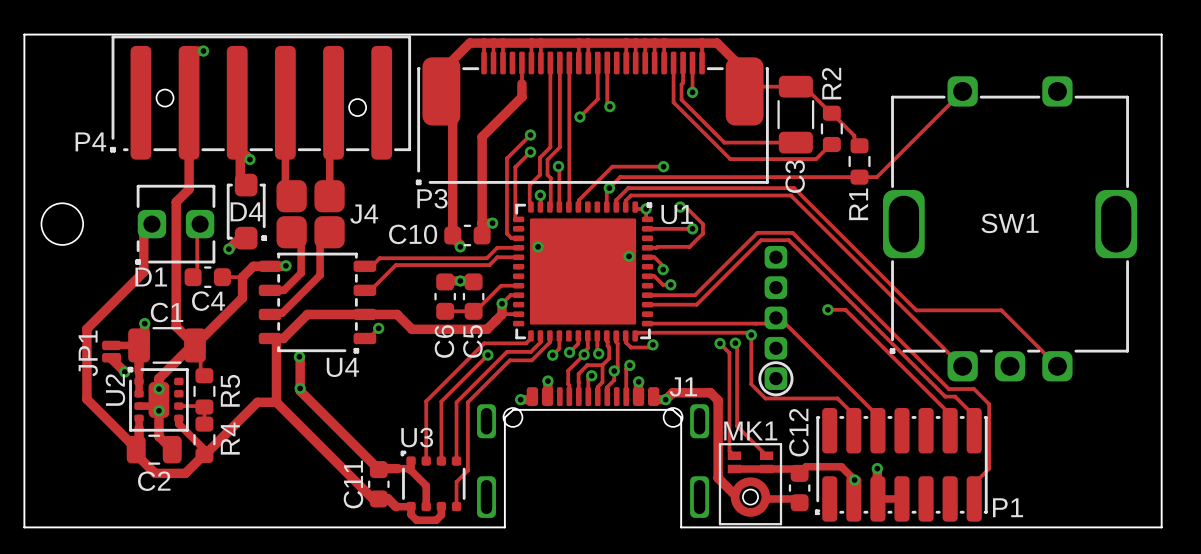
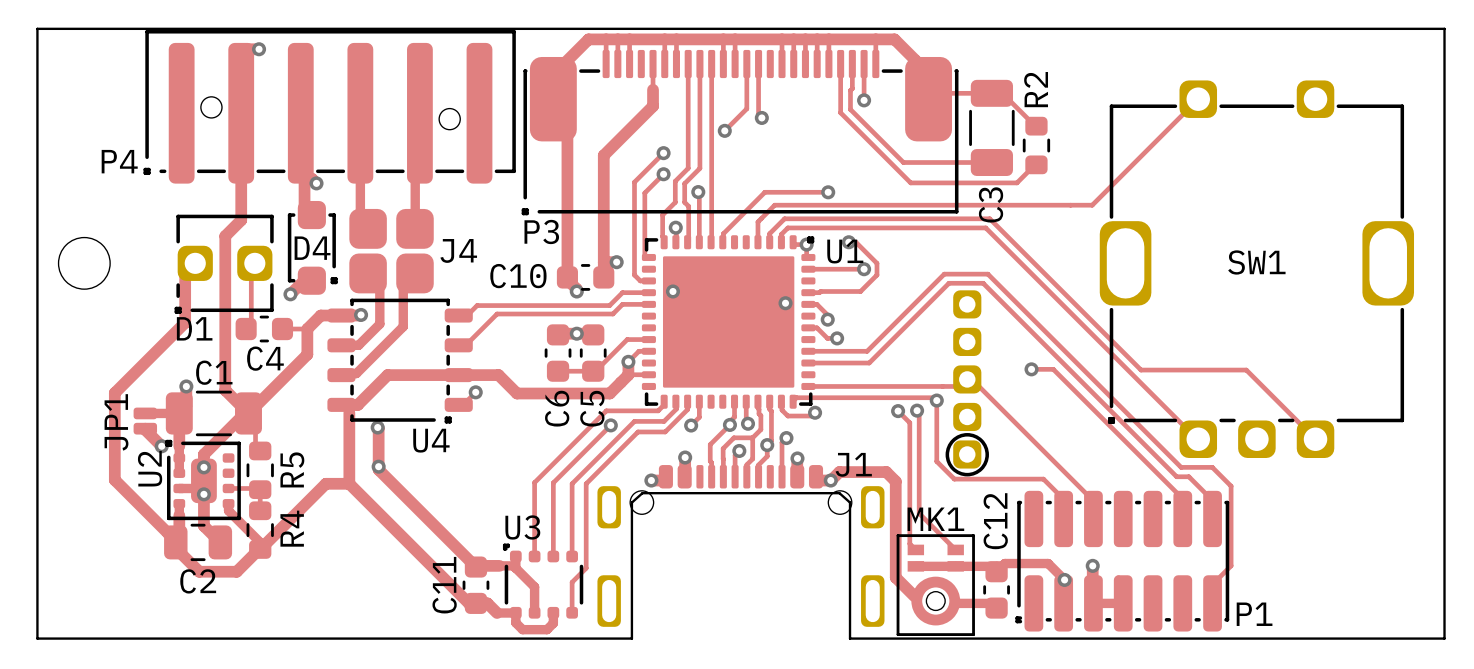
track: (831, 113) (854, 135) (854, 140) (859, 145) -> none
R1: (859, 161) -> none
via: (609, 188) -> none
track: (578, 335) (578, 343) (569, 352) -> none
via: (569, 352) -> none

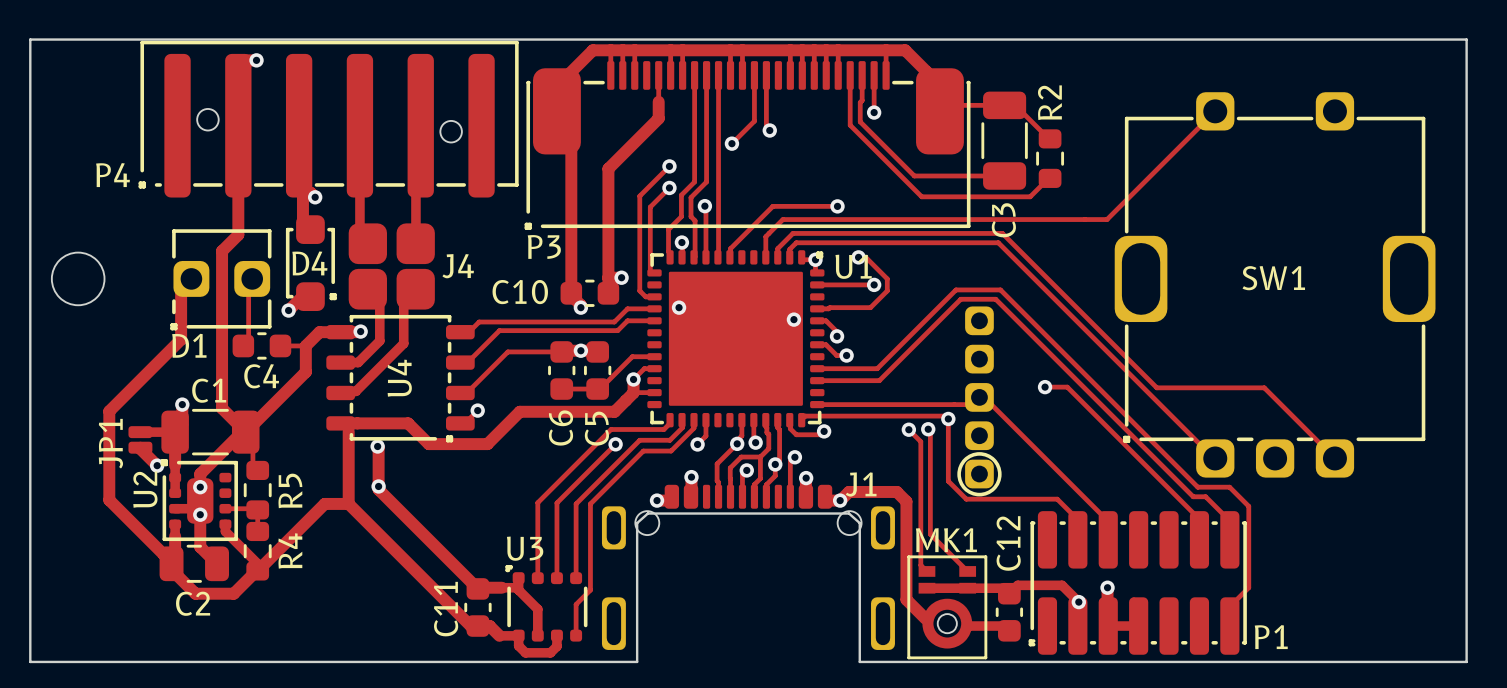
track: (458, 375) (387, 375) (357, 404) -> (519, 411) (487, 444) (428, 444) (408, 423) (357, 423)
track: (465, 375) (498, 375) (517, 393) -> (466, 392) (507, 351) (561, 351)
U4 name rotation: 0° (431, 440) -> 90° counterclockwise (399, 378)
U4 name position: U4 (431, 440) -> U4 (399, 378)

